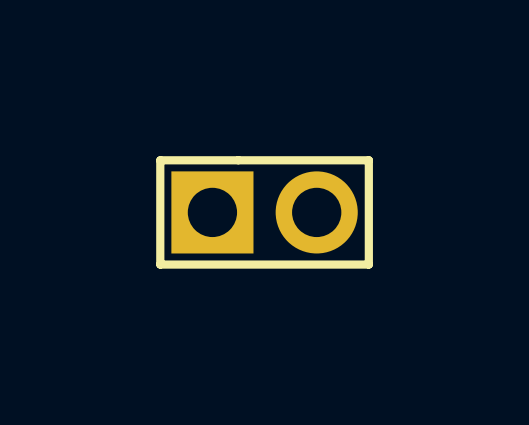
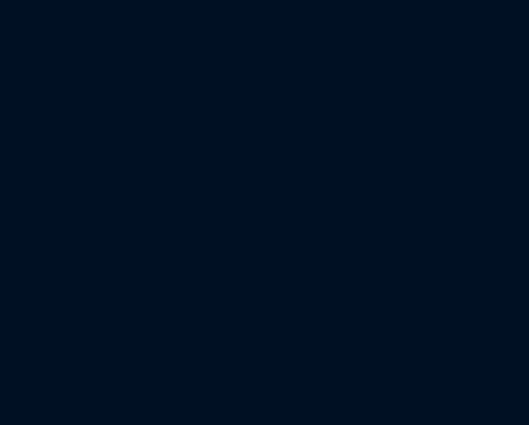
part: (264, 212) -> none

